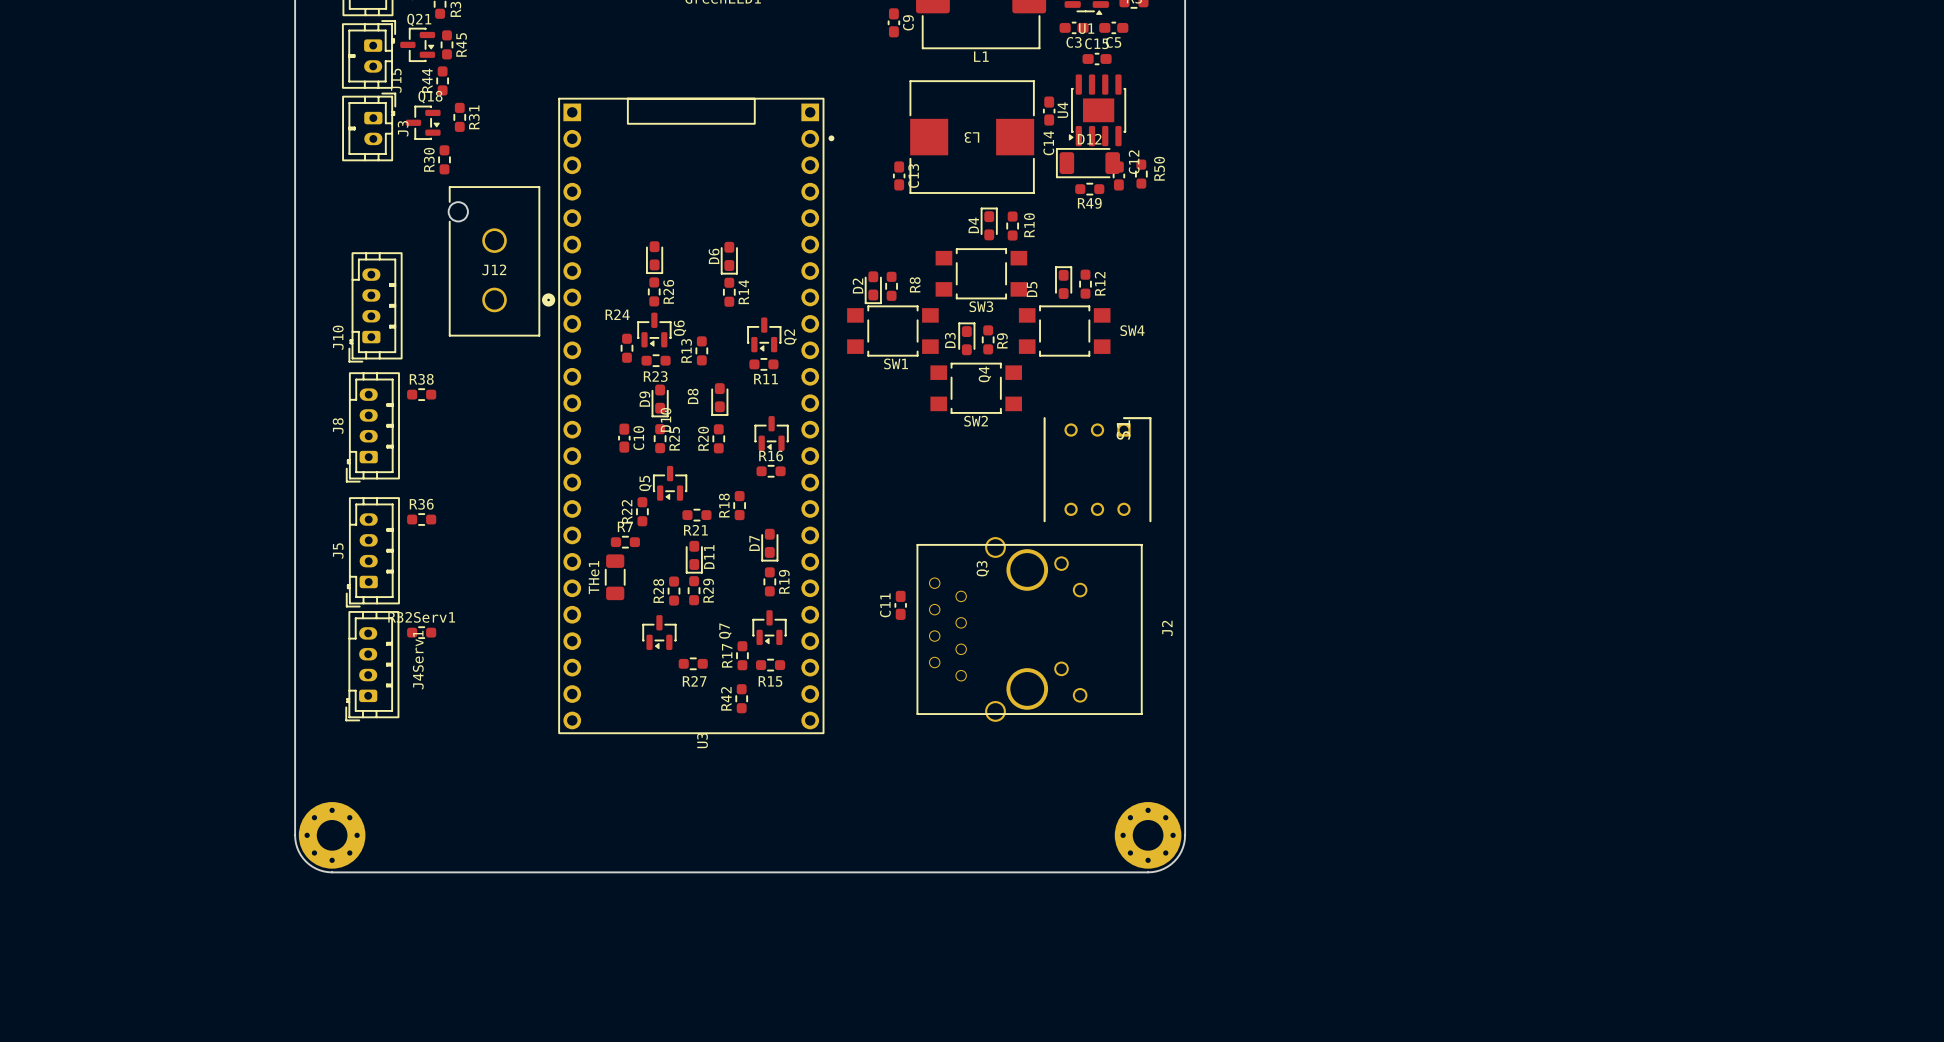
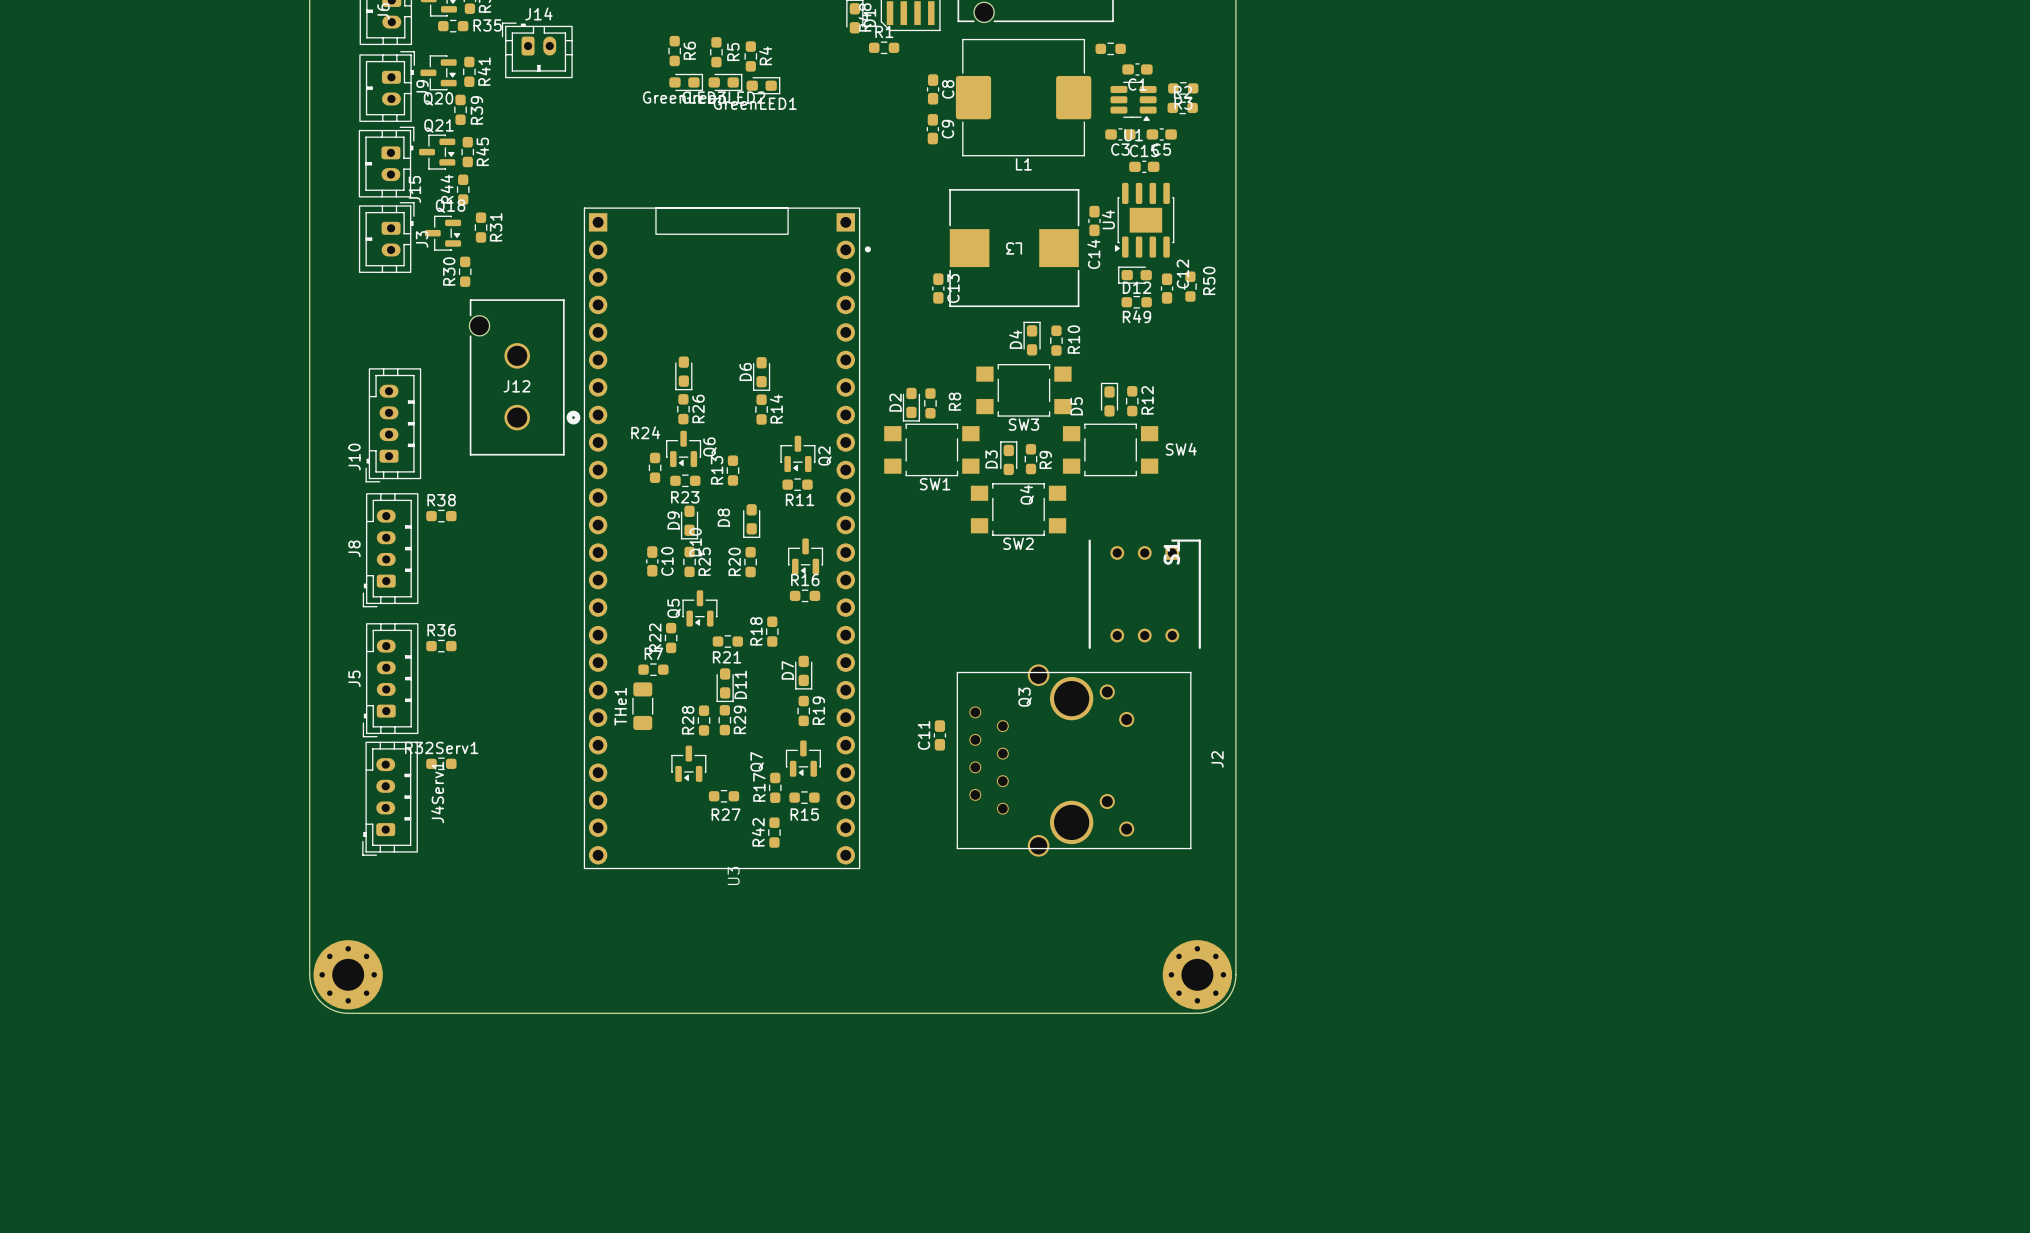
D12 name position: D12 (1089, 139) -> D12 (1136, 287)
D12 footprint: [1056, 148, 1120, 178] -> [1118, 266, 1152, 284]

